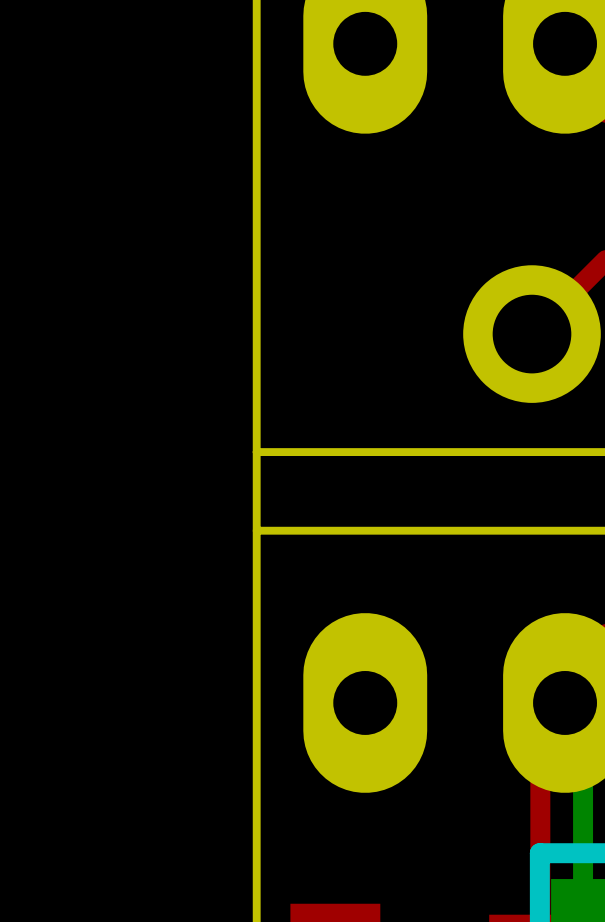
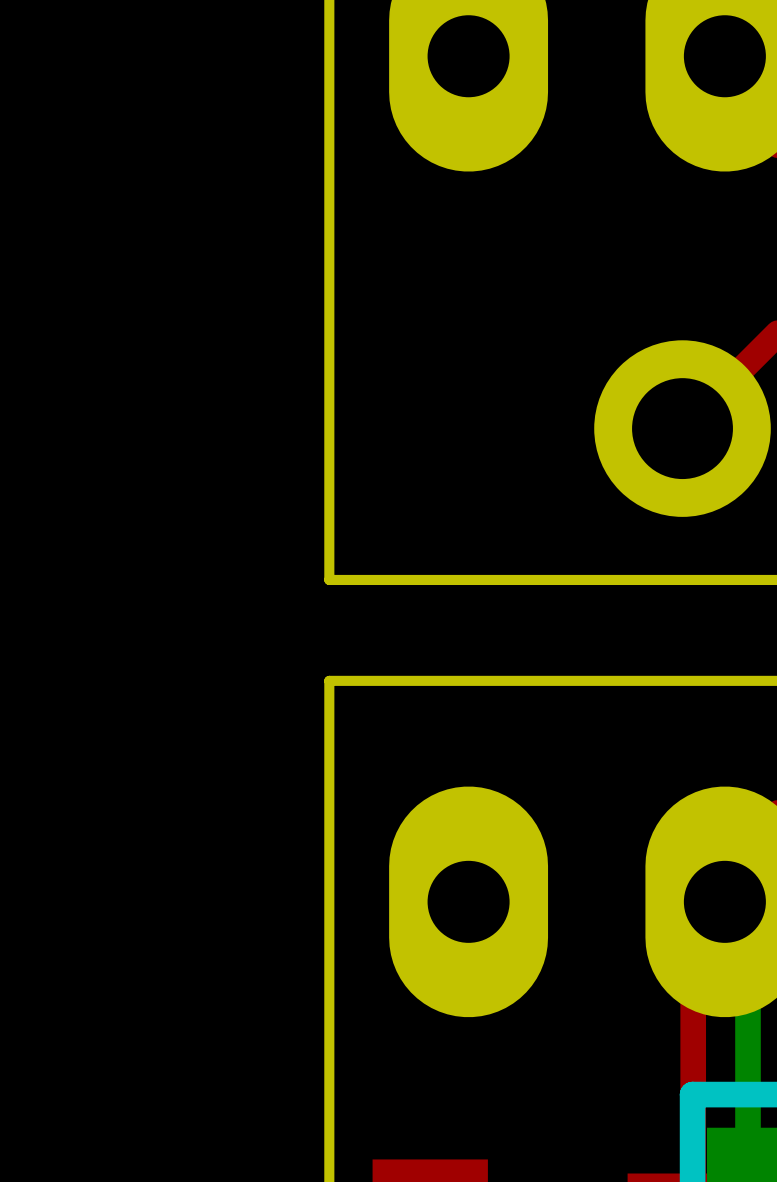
board edge: (256, 452) (256, 530) -> none

